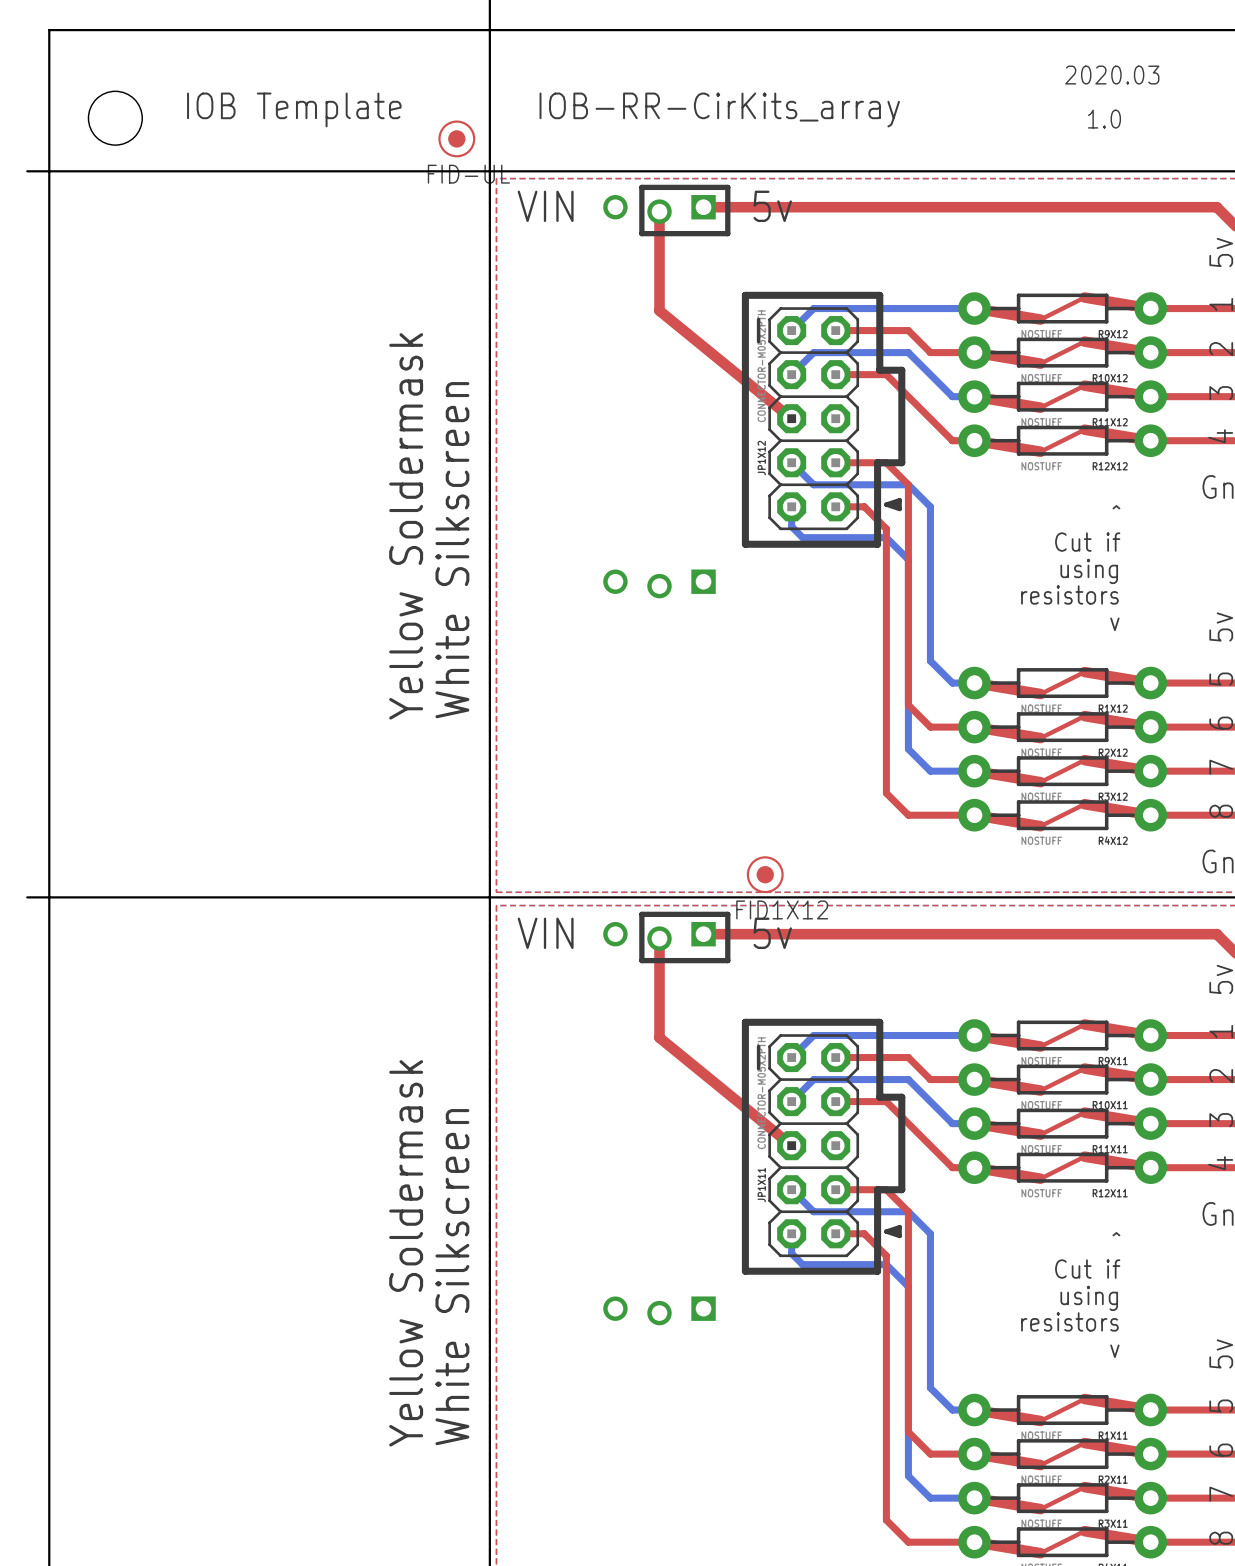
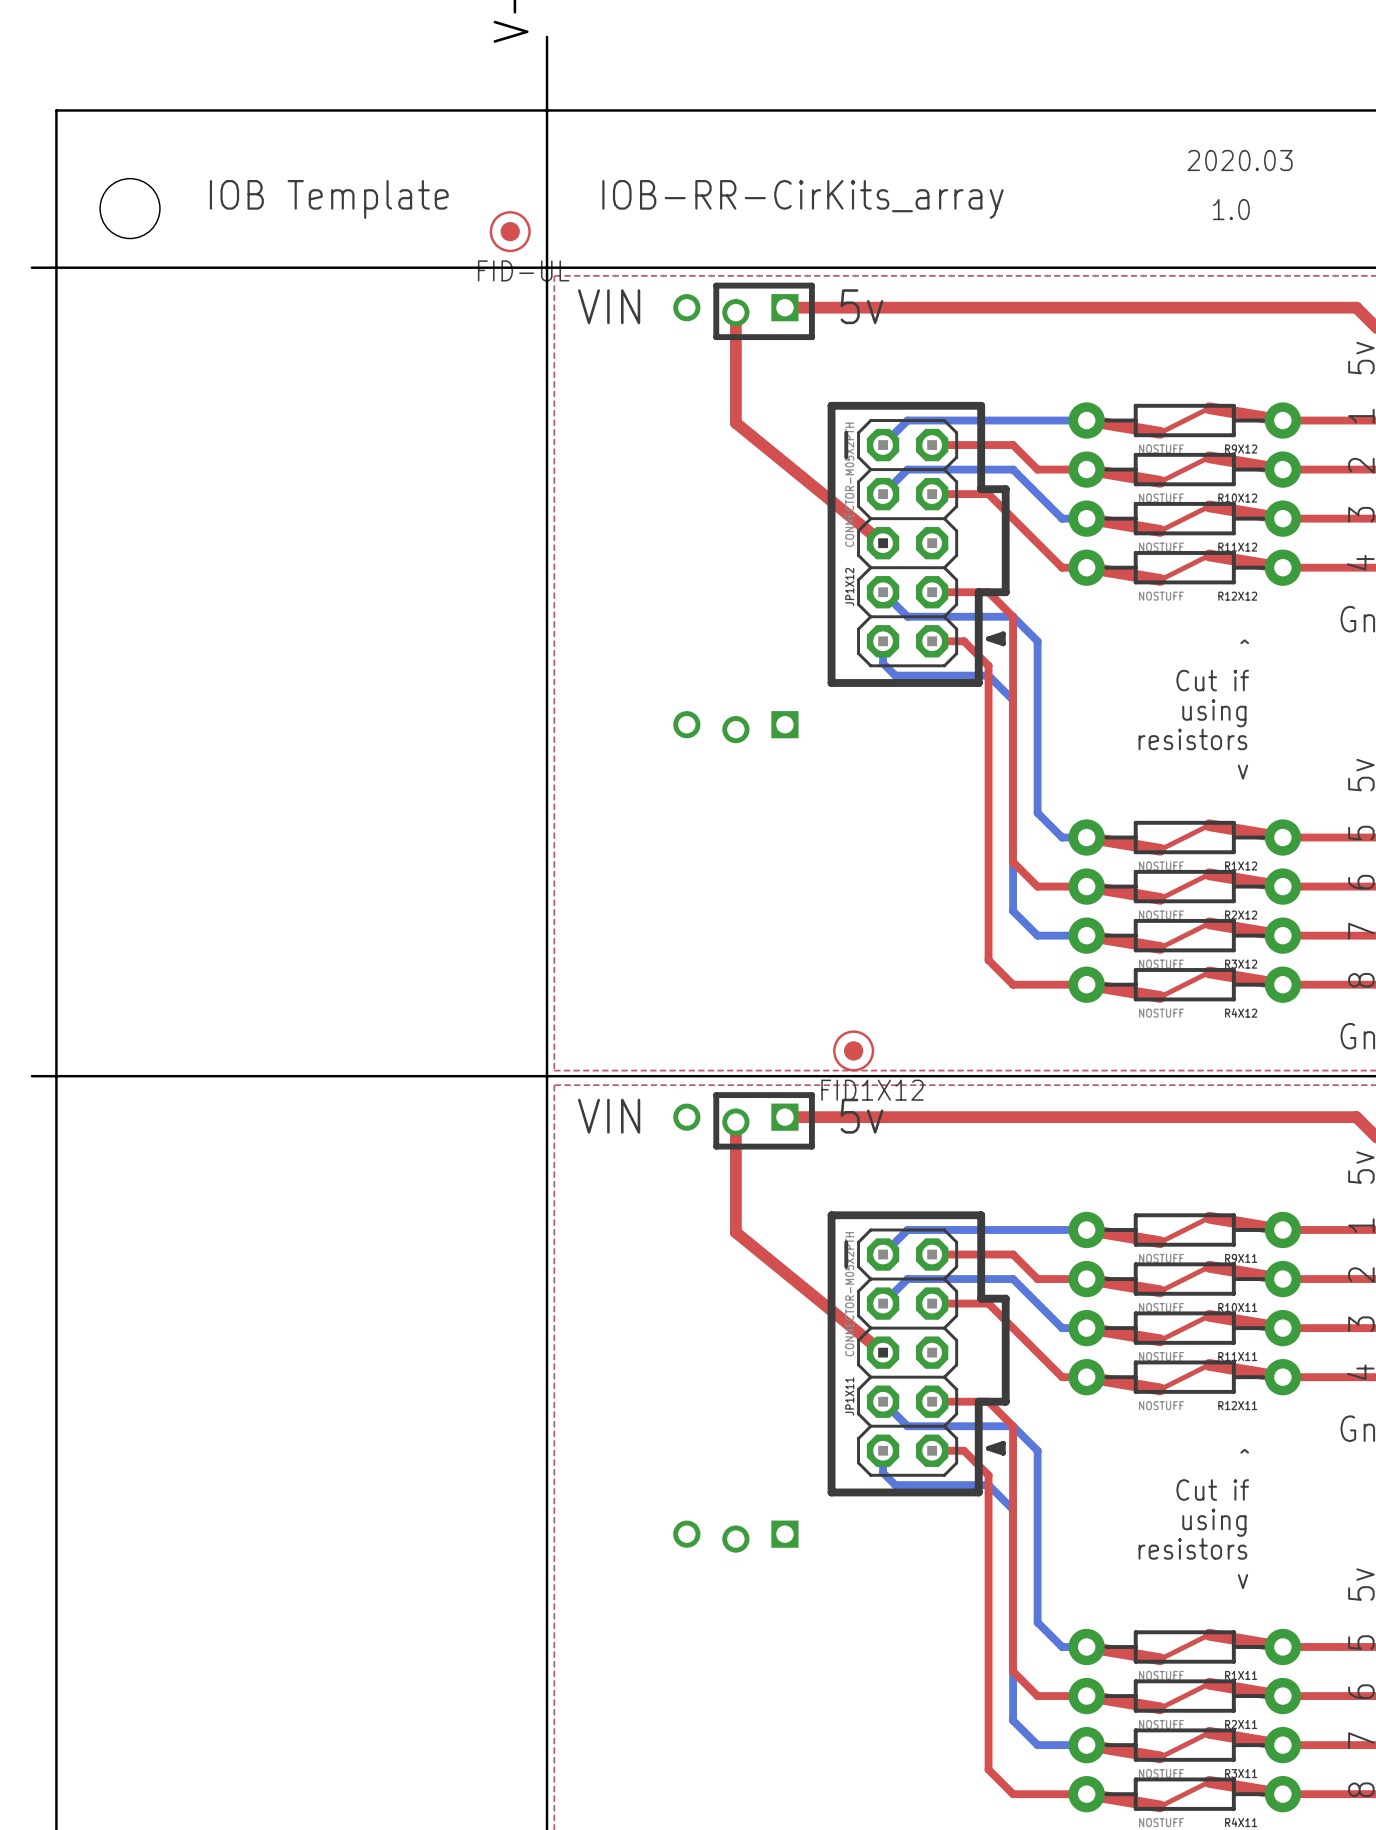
text: Yellow Soldermask (406, 526) -> none
text: White Silkscreen (452, 550) -> none
text: Yellow Soldermask (406, 1253) -> none
text: White Silkscreen (452, 1277) -> none

